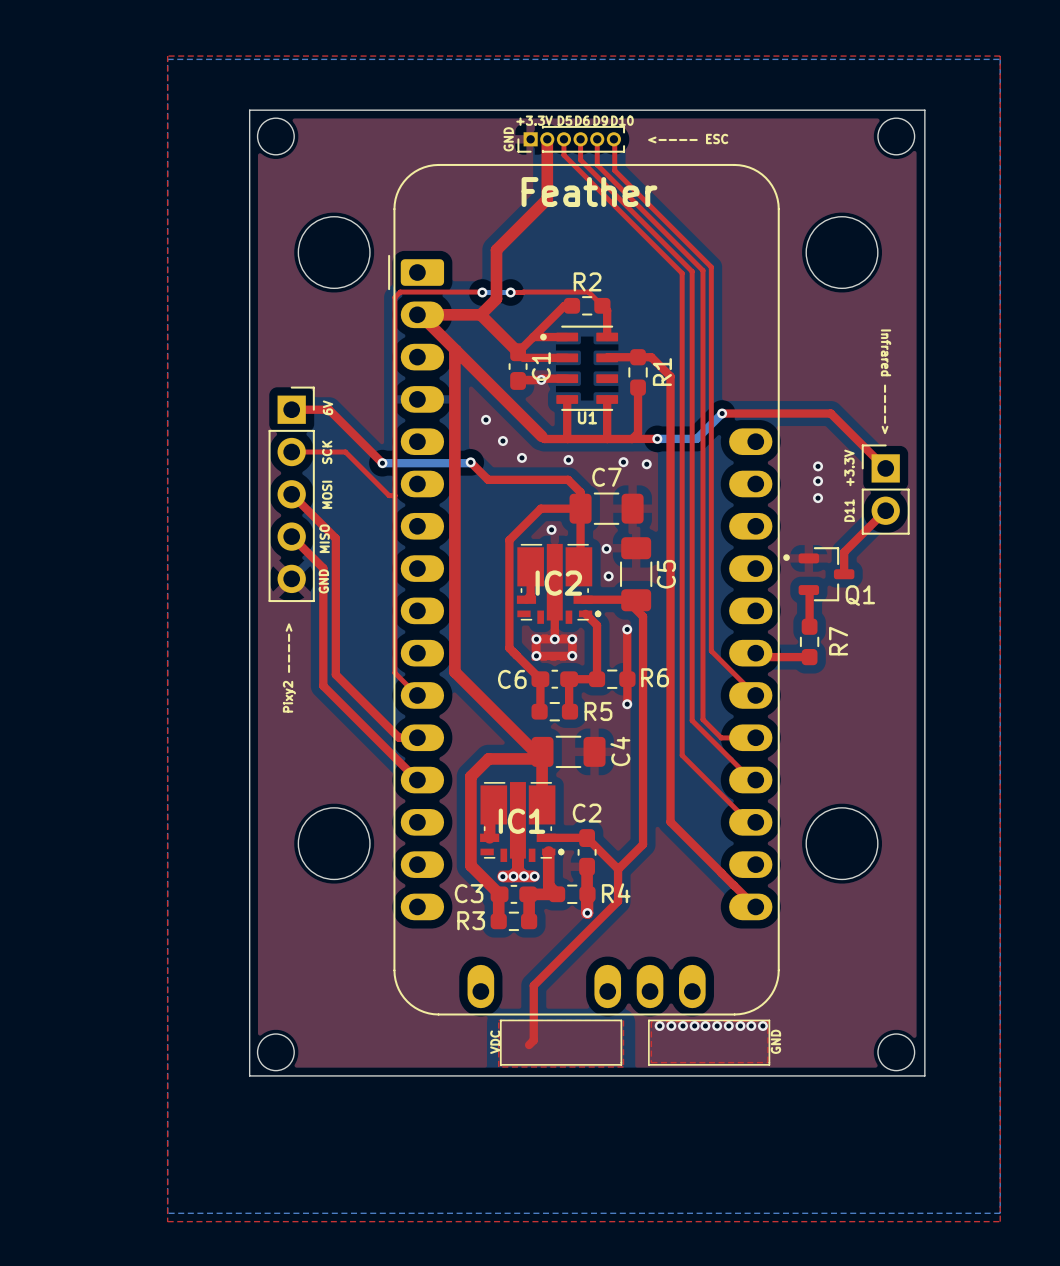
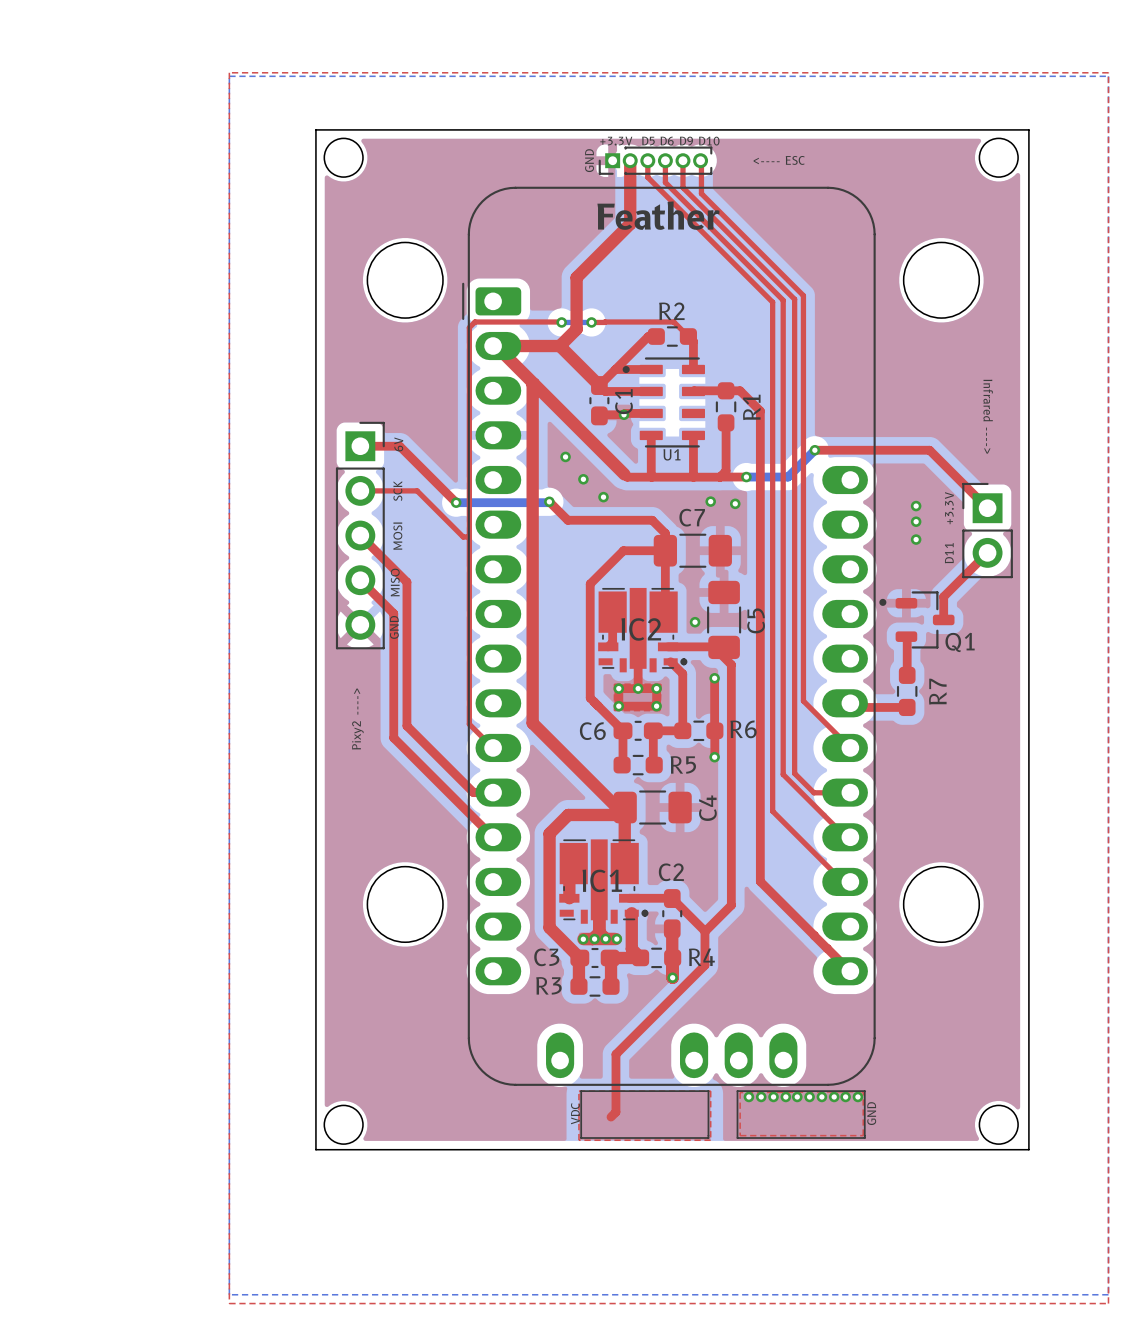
via: (568, 460) -> none
via: (551, 529) -> none
via: (606, 548) -> none

